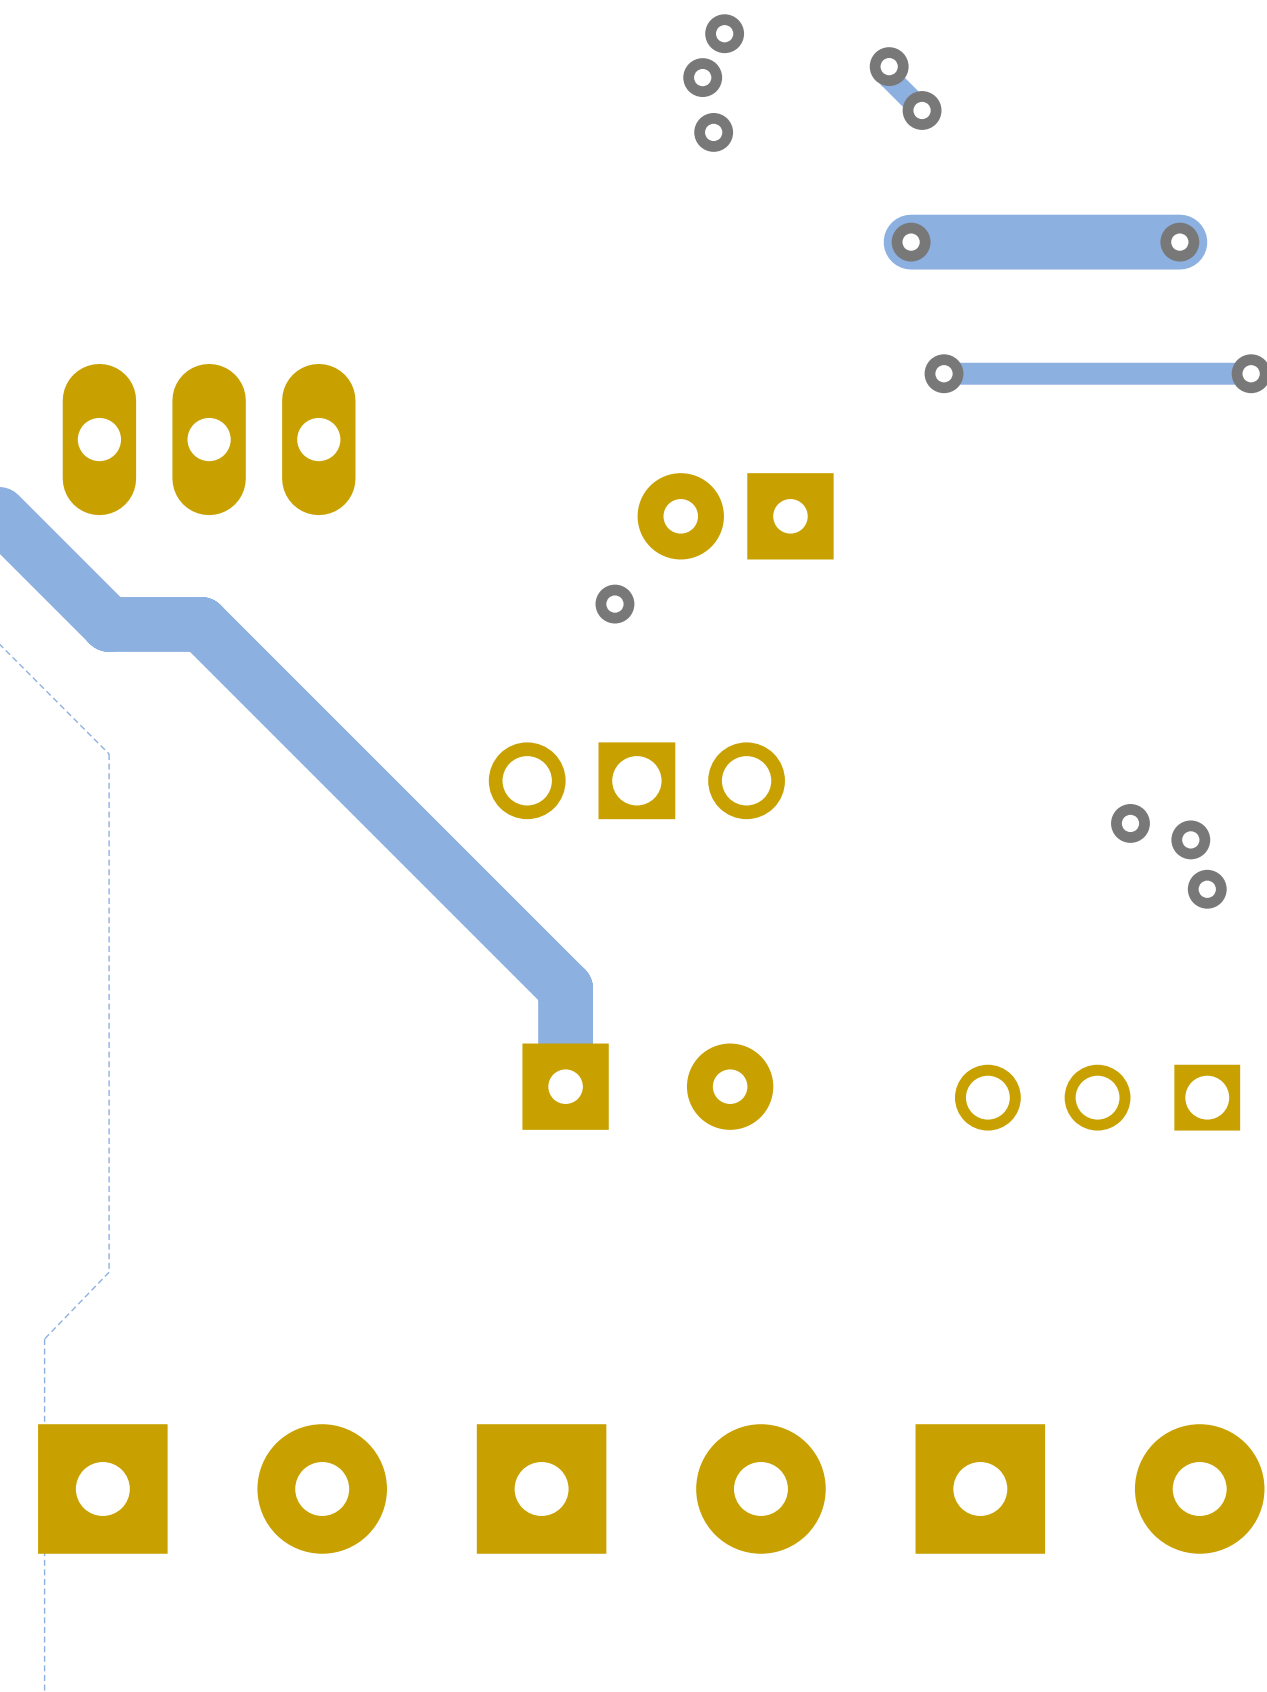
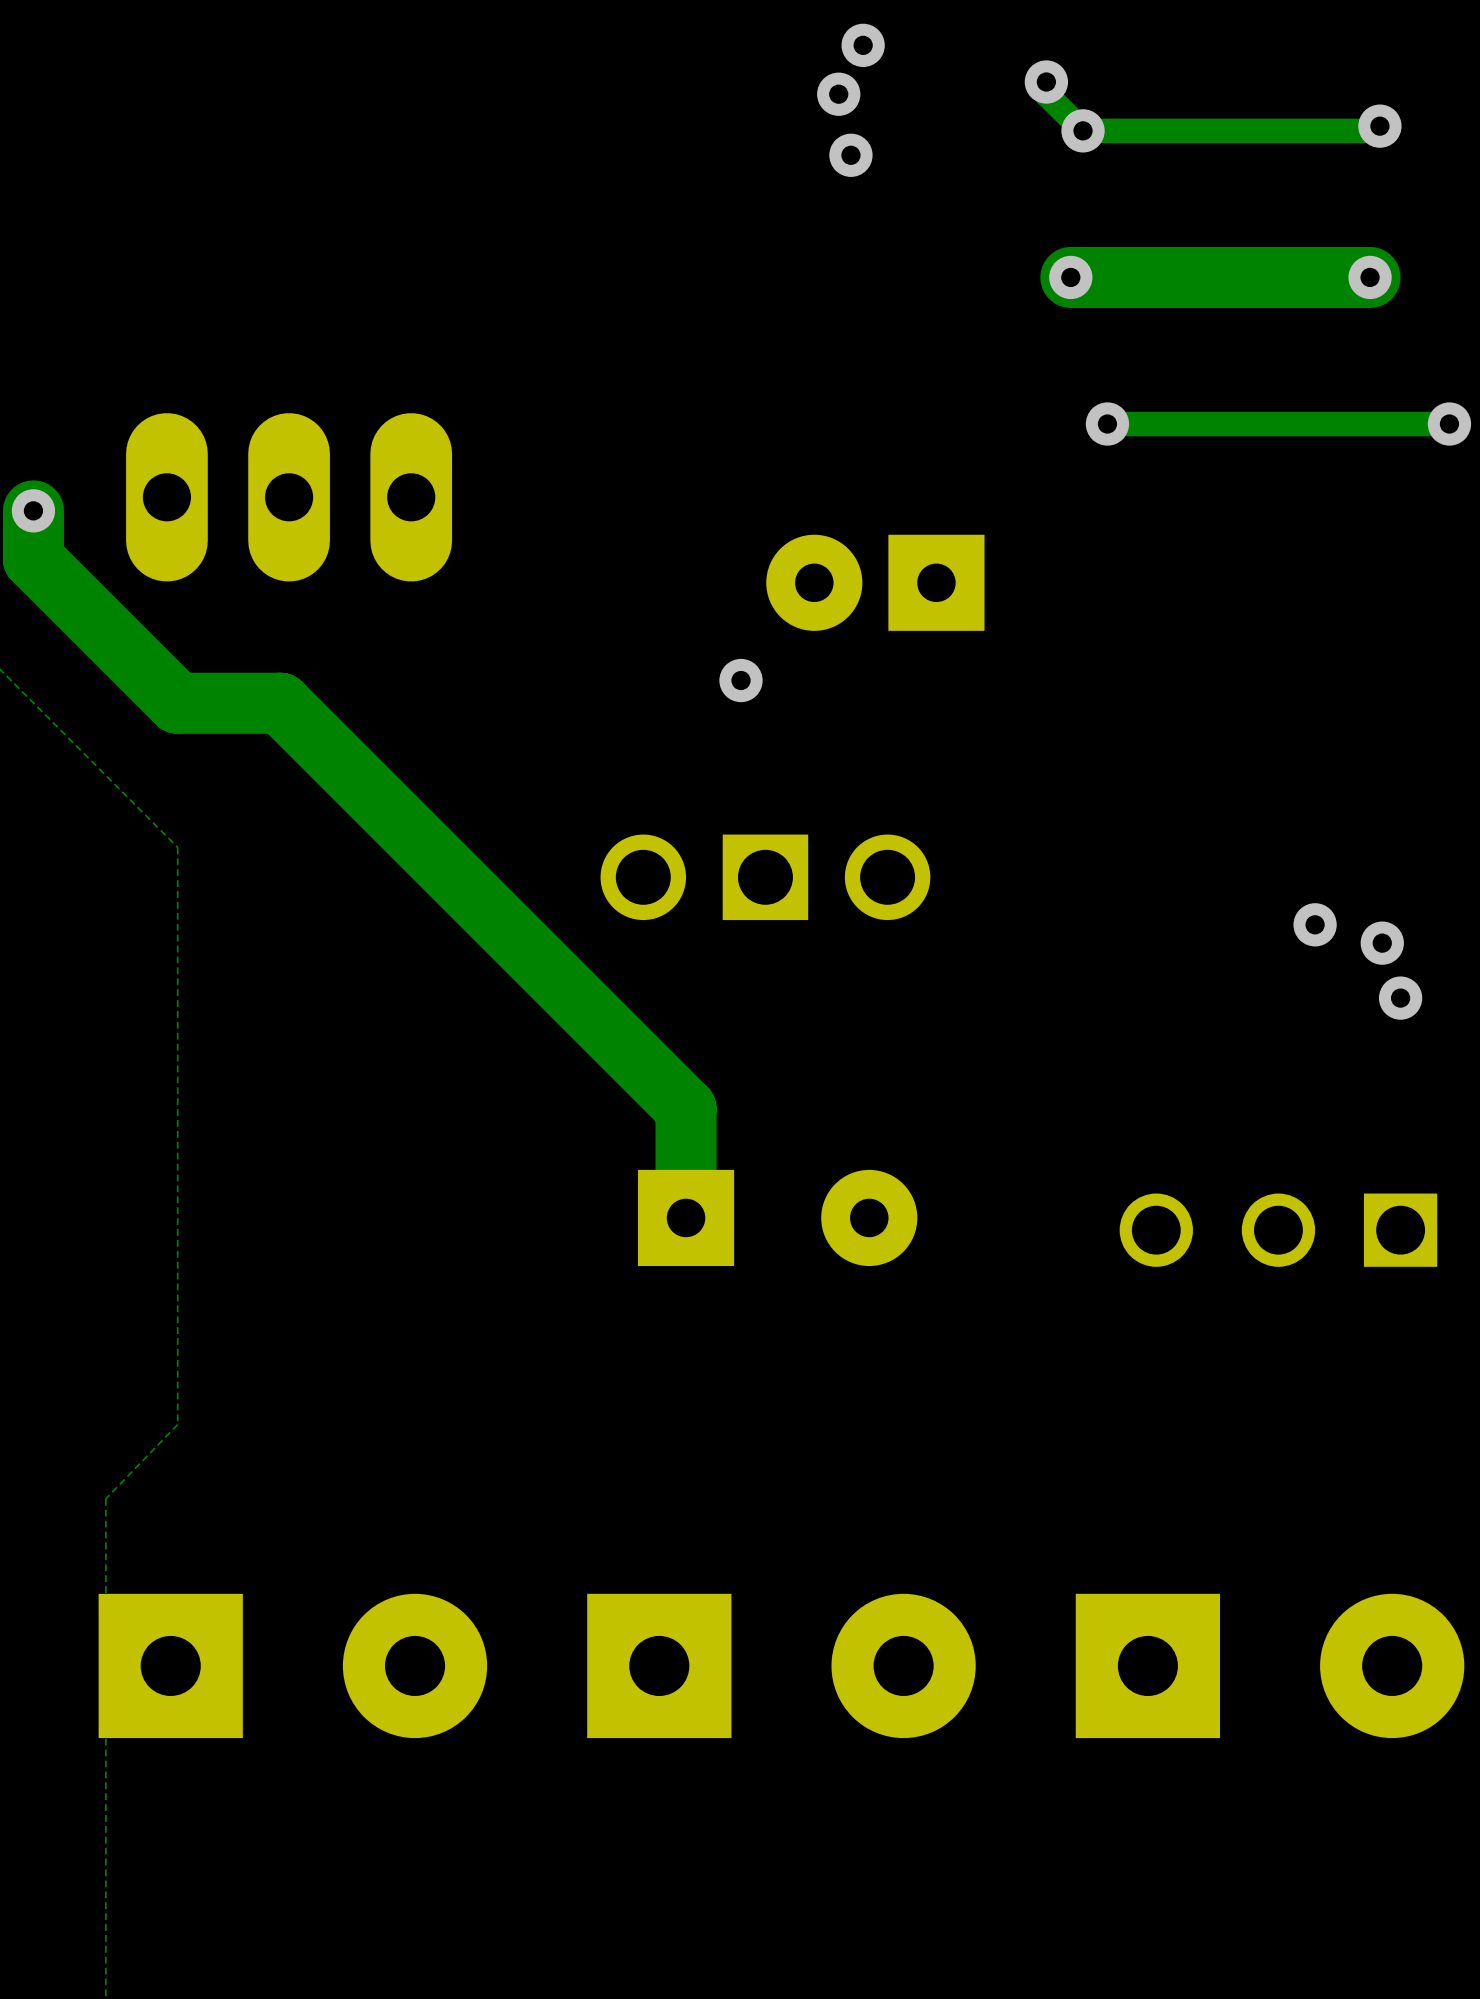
track: none -> (1379, 126) (1375, 130) (1083, 130)
via: none -> (1379, 126)

